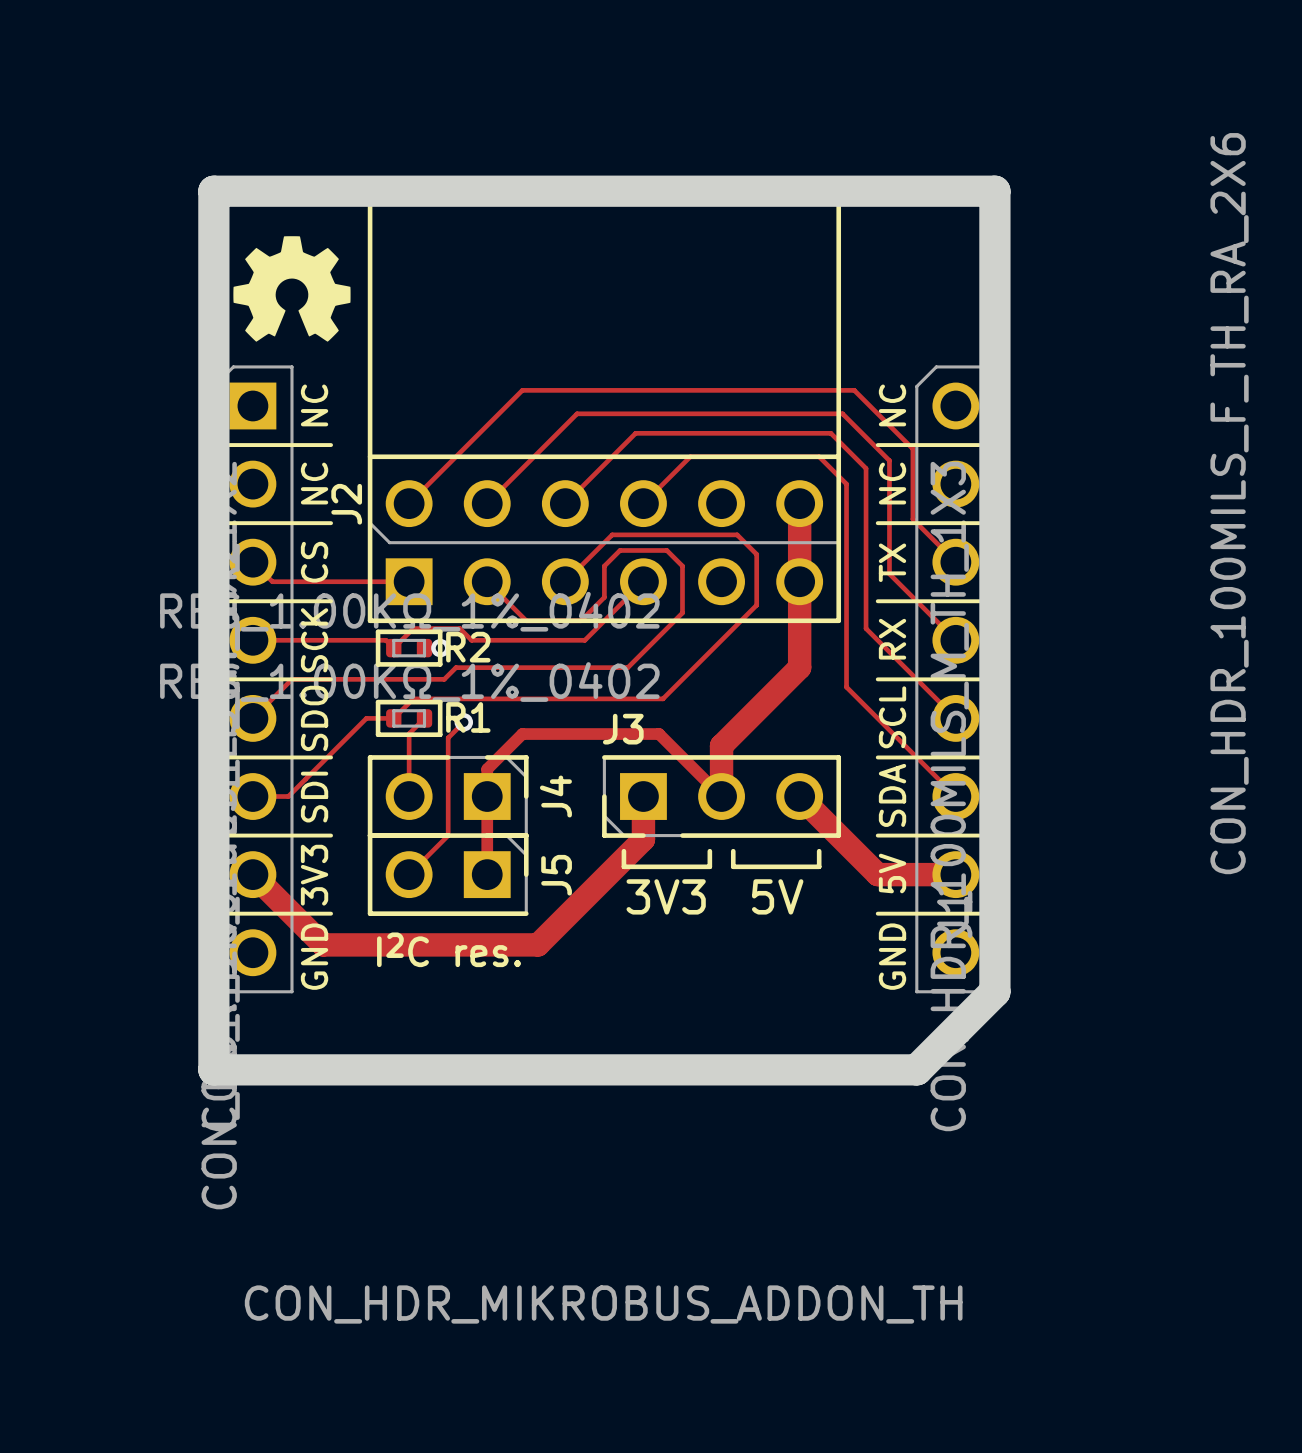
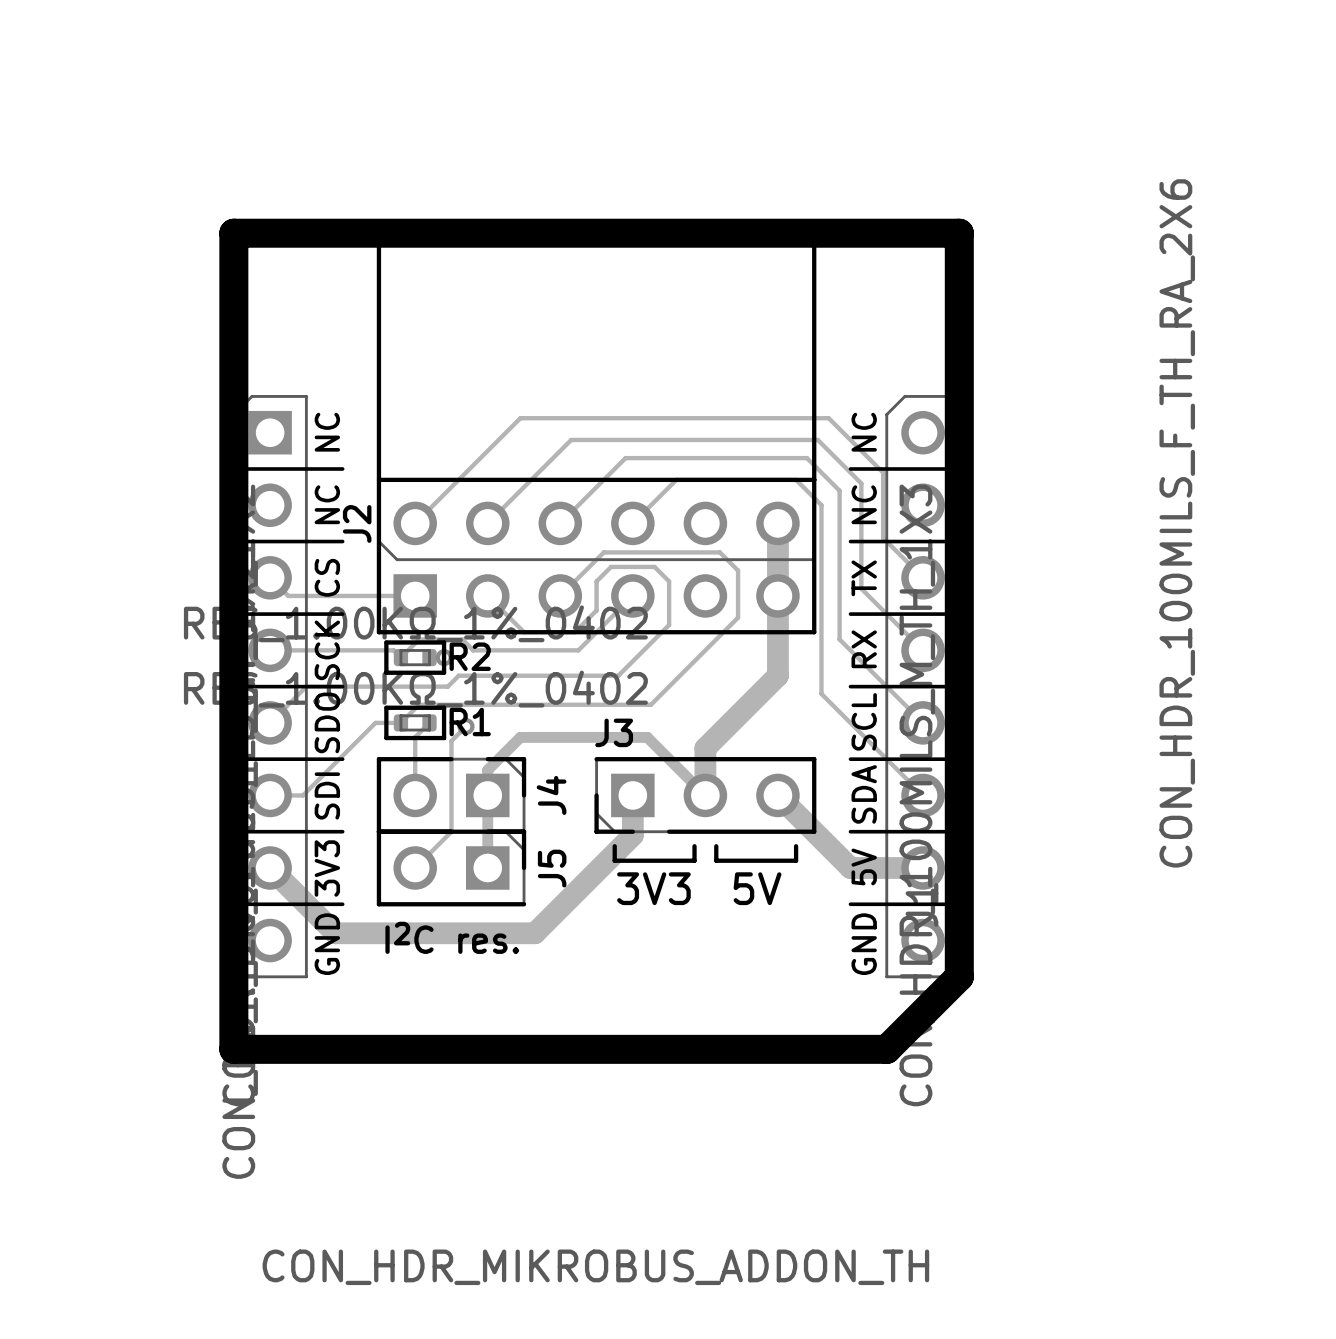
drawing: [233, 236, 351, 342] -> none

